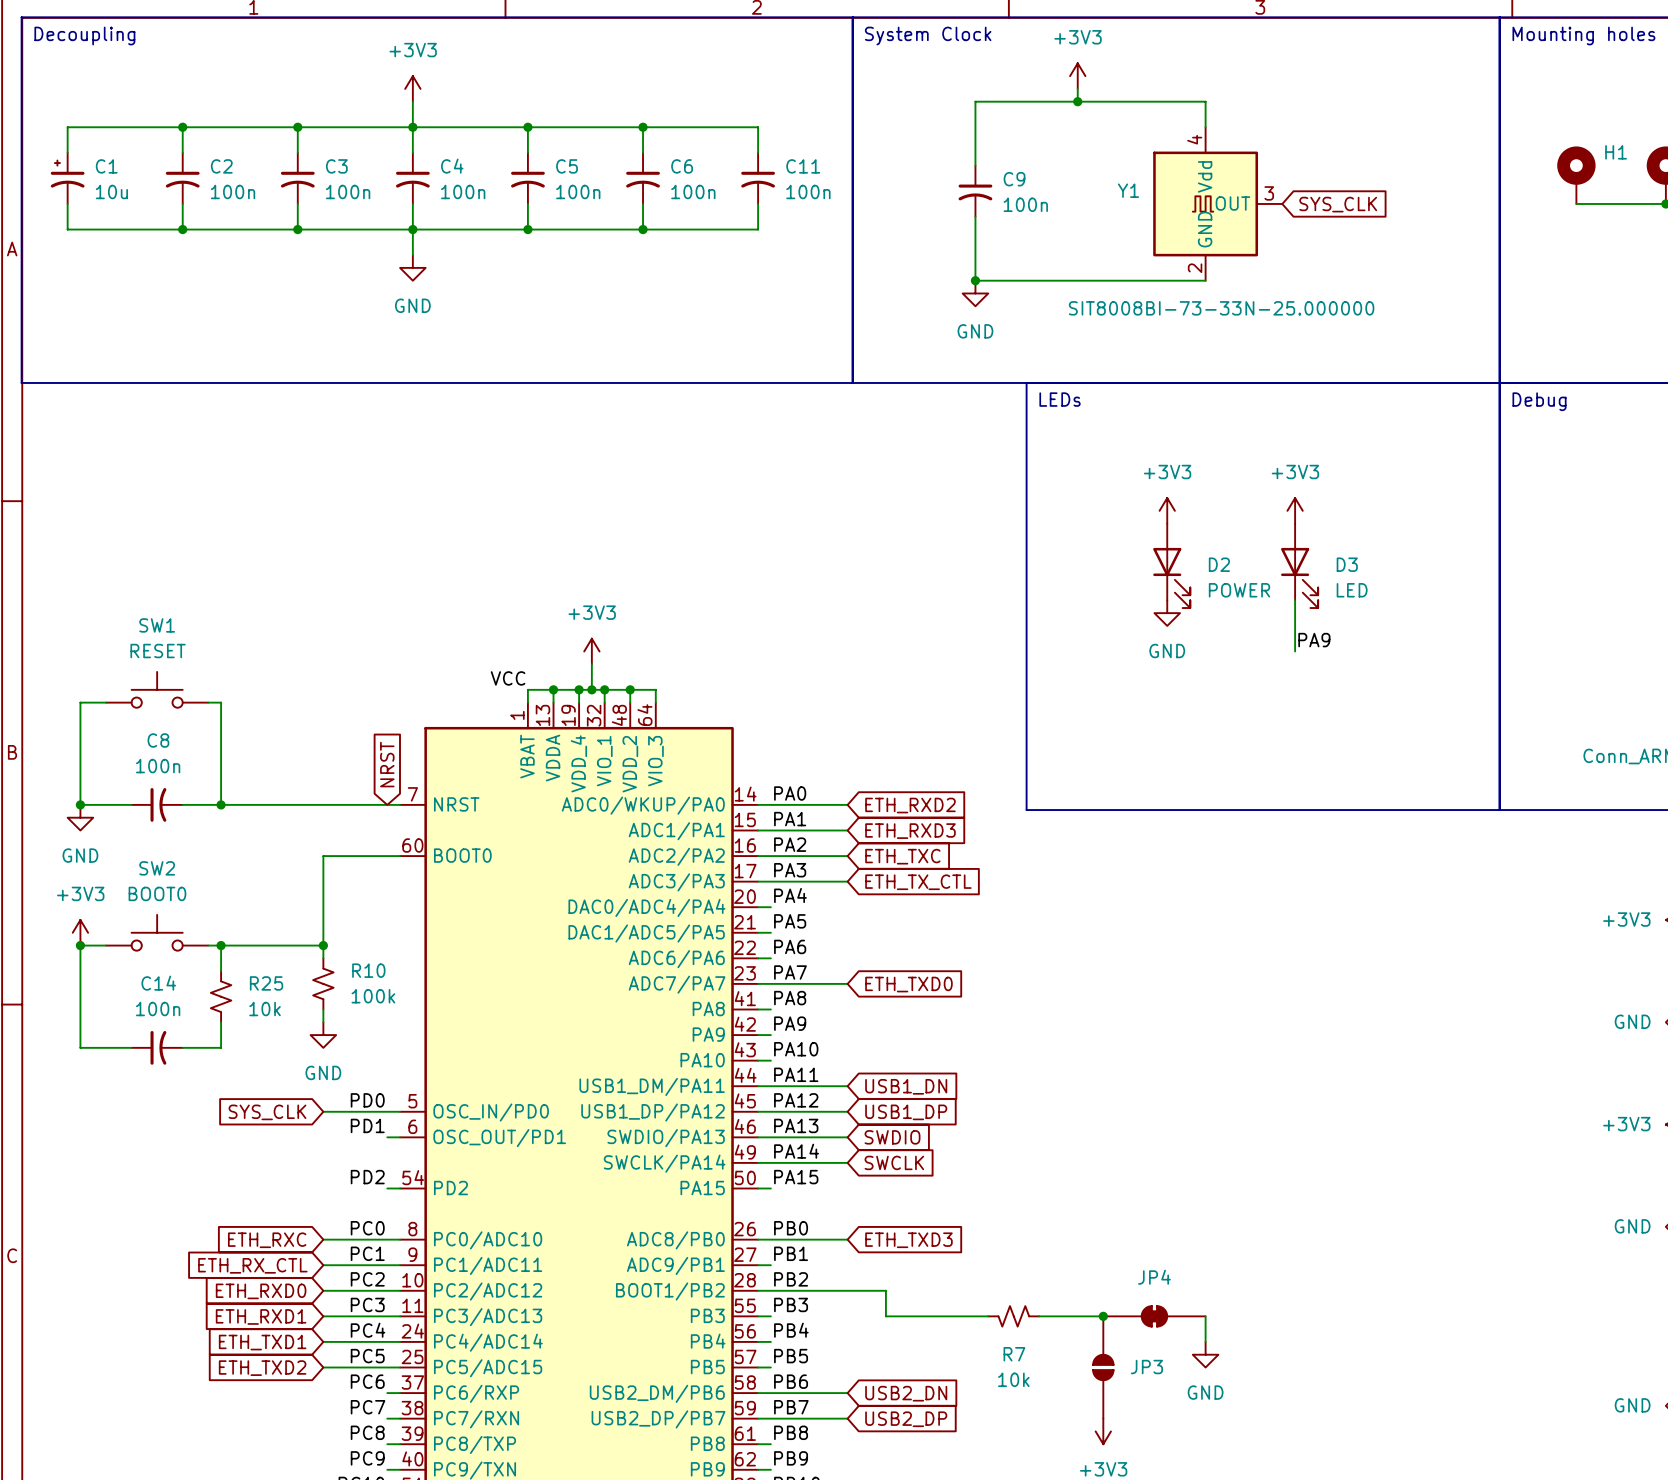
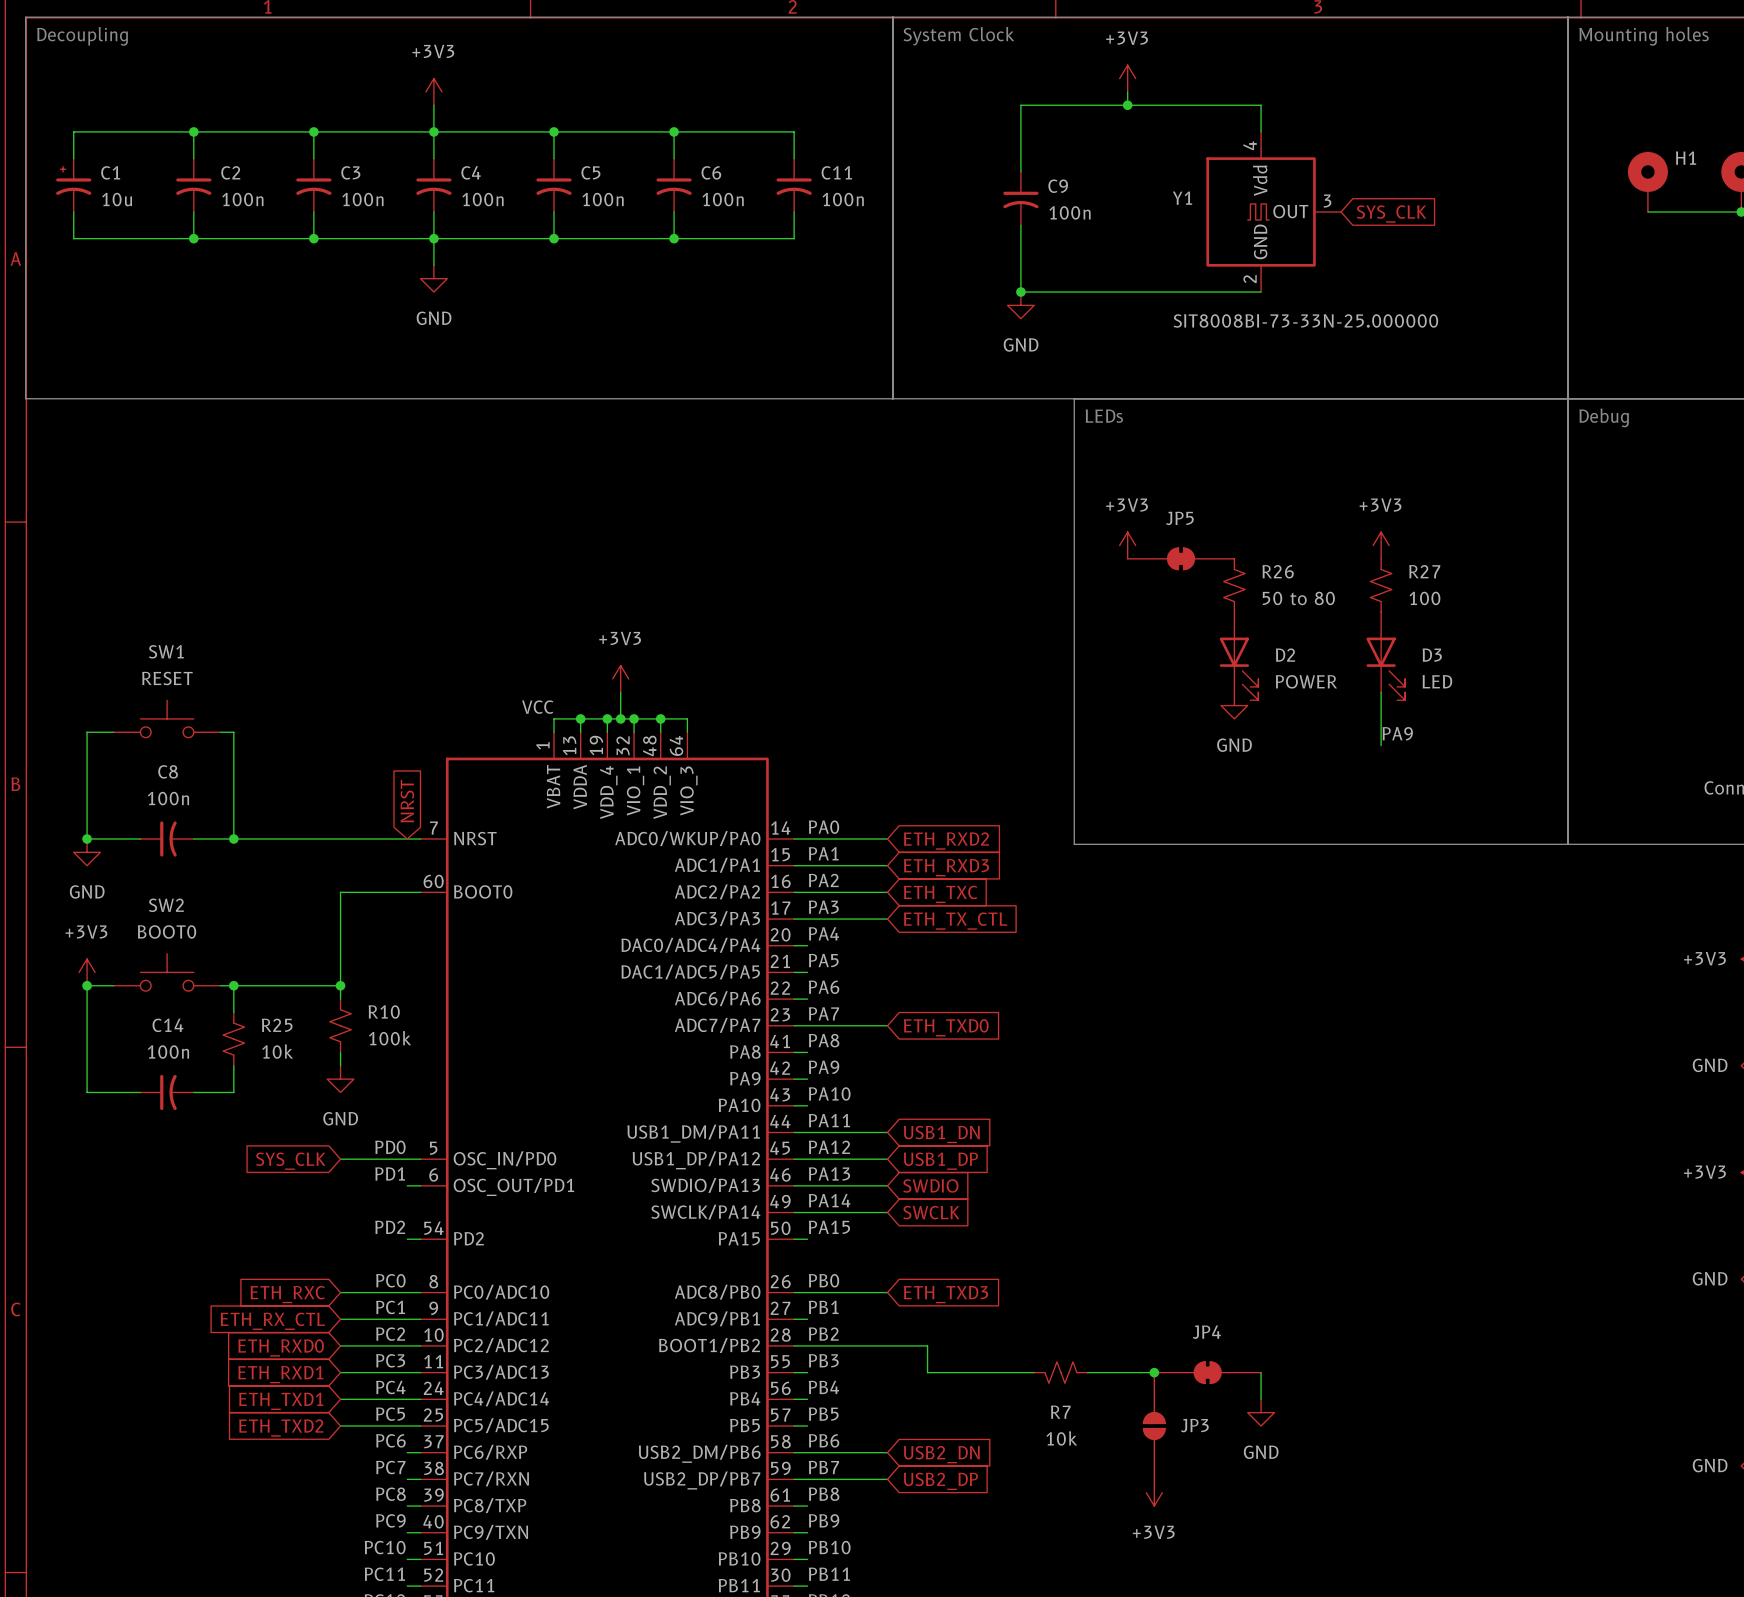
power symbol: +3V3 (1167, 510) -> none
power symbol position: +3V3 (1295, 510) -> +3V3 (1381, 545)
power symbol: none -> +3V3 (1127, 545)
JP5: none -> (1181, 558)
R26: none -> 50 to 80 (1234, 585)
R27: none -> 100 (1381, 585)
D2 position: (1171, 565) -> (1239, 656)
D3 position: (1299, 565) -> (1385, 656)
wire: (1295, 600) (1295, 651) -> (1381, 692) (1381, 745)
power symbol position: GND (1167, 613) -> GND (1234, 705)
label position: PA9 (1314, 640) -> PA9 (1397, 733)

